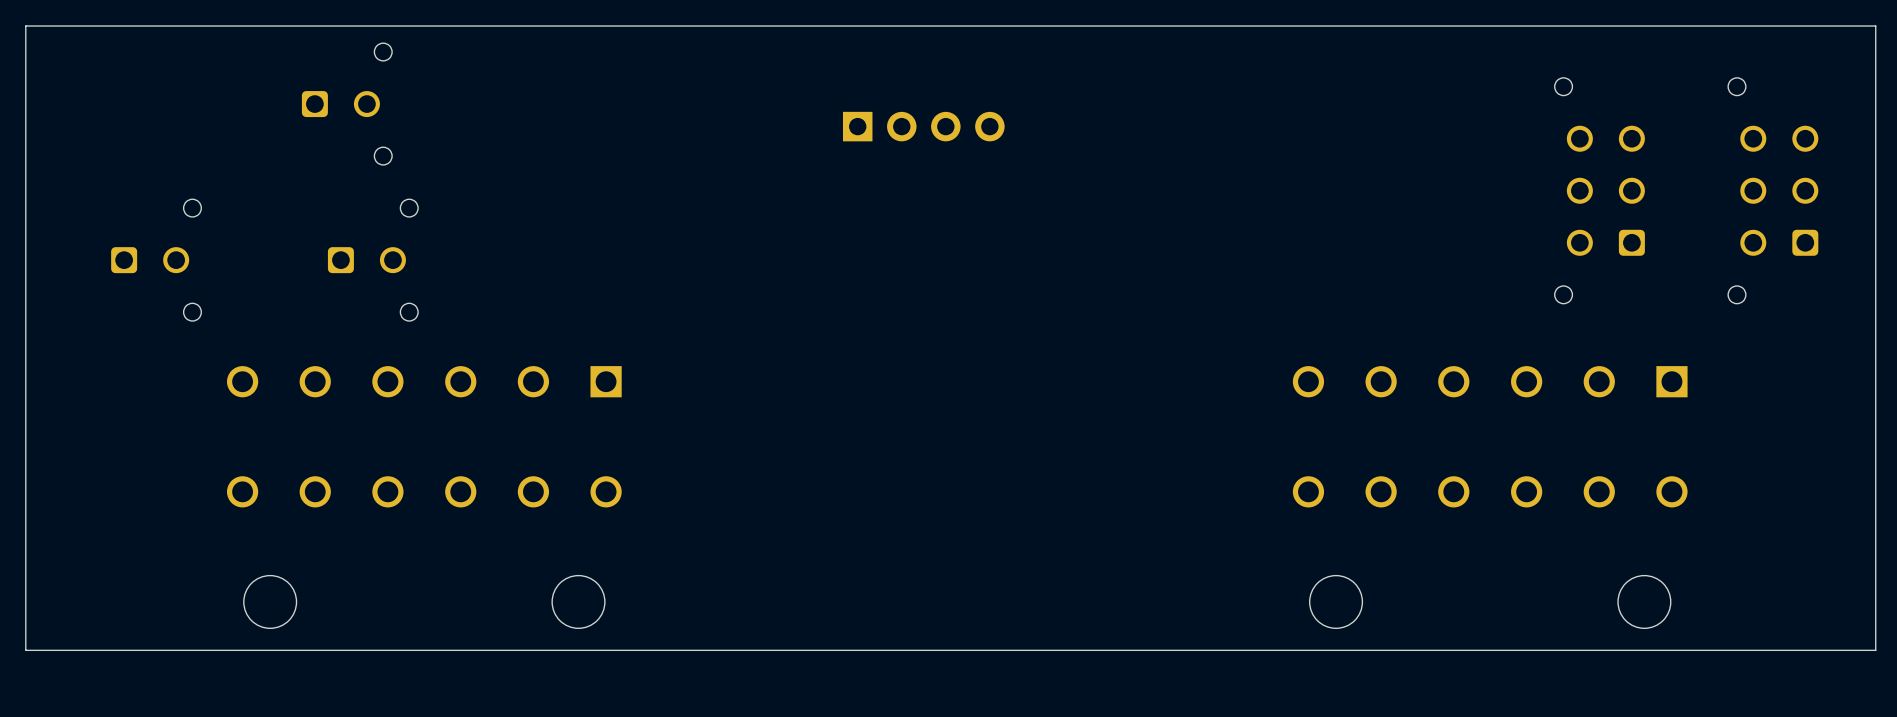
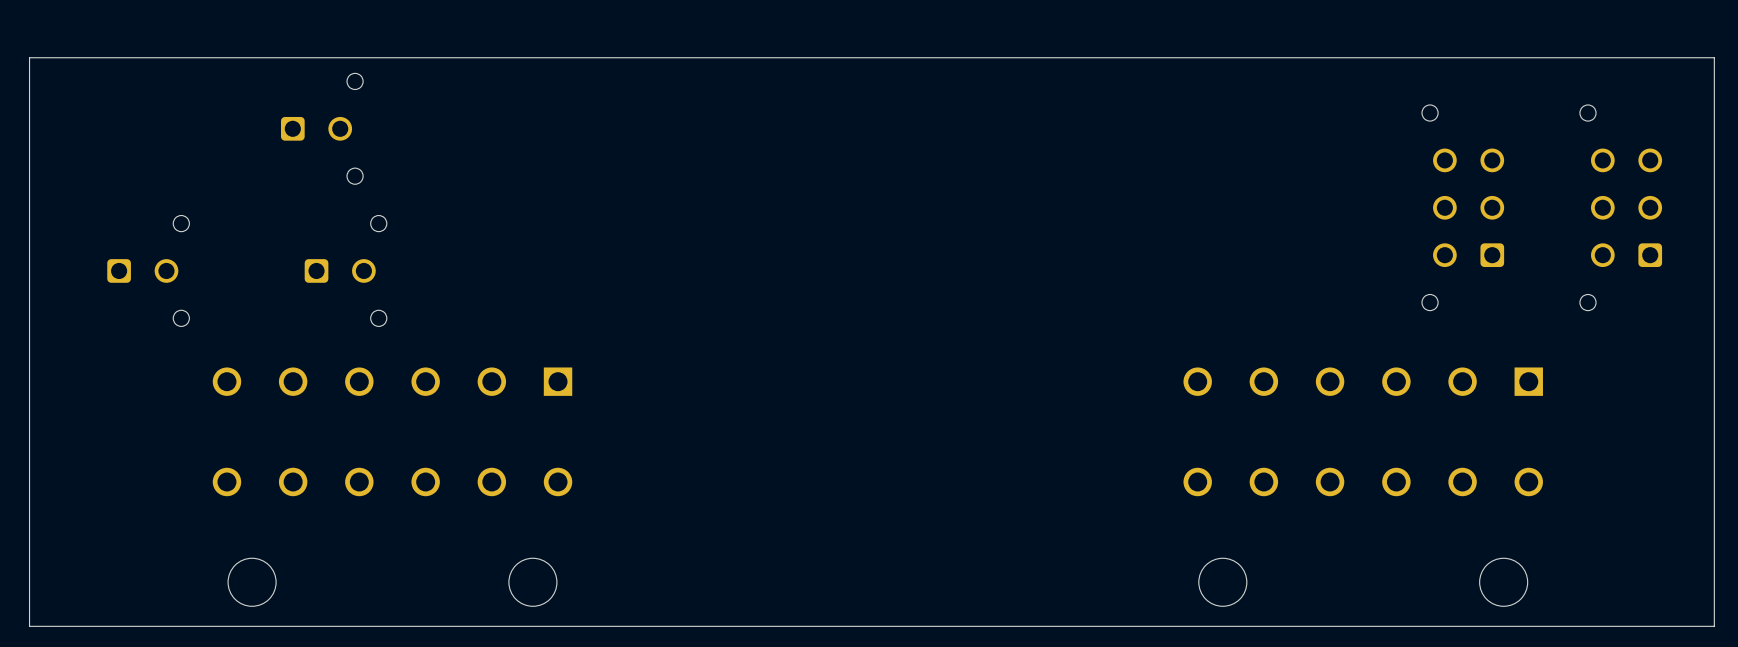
part: (923, 126) -> none

